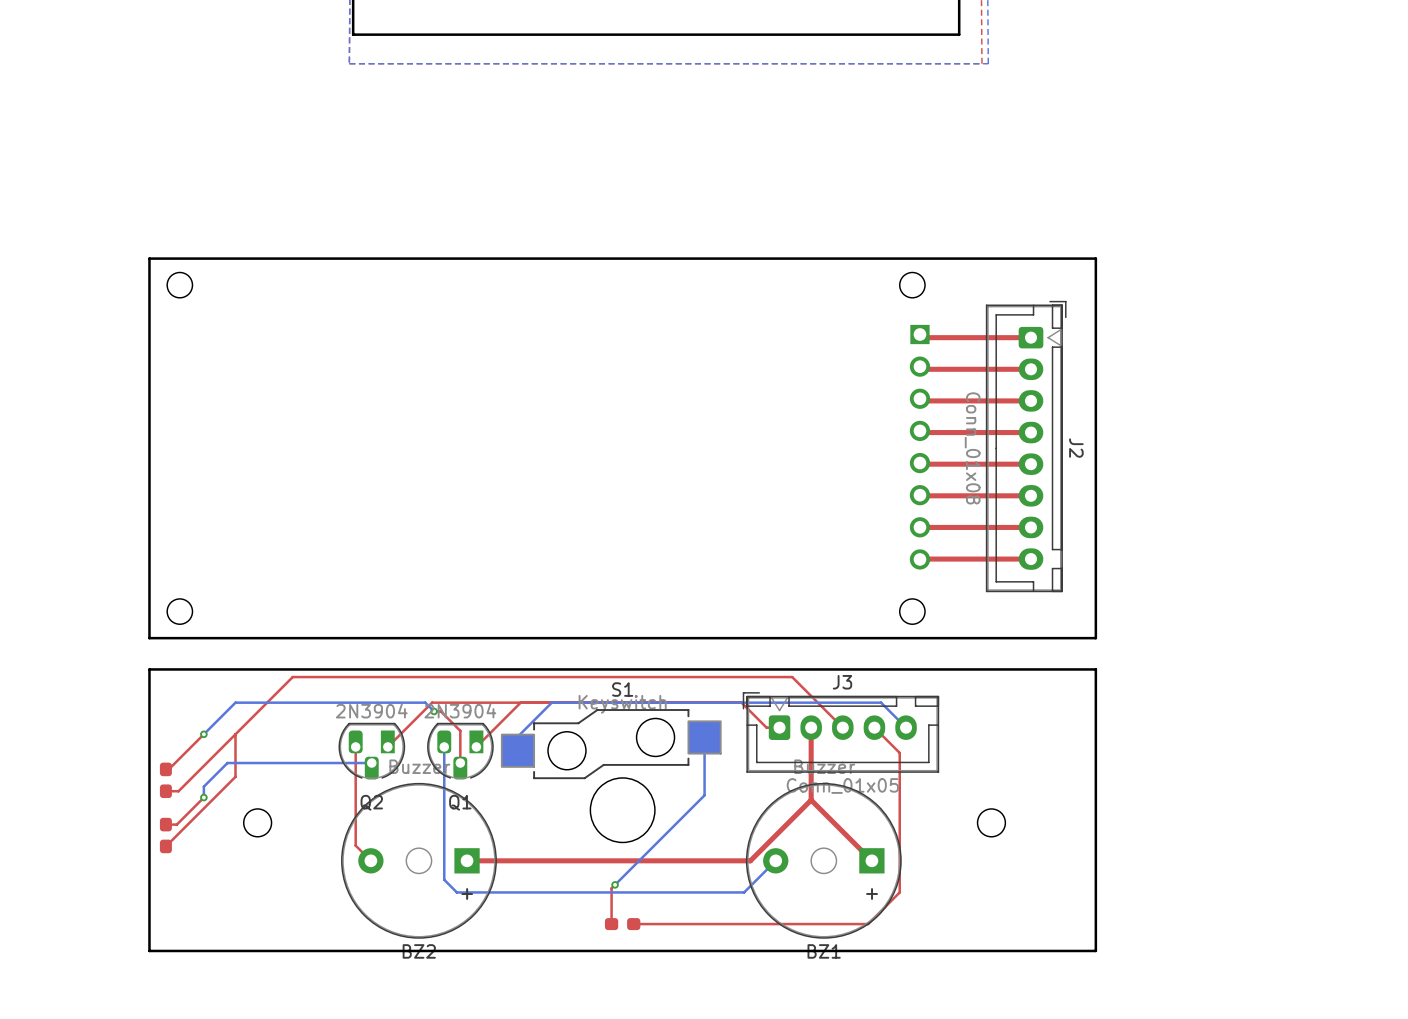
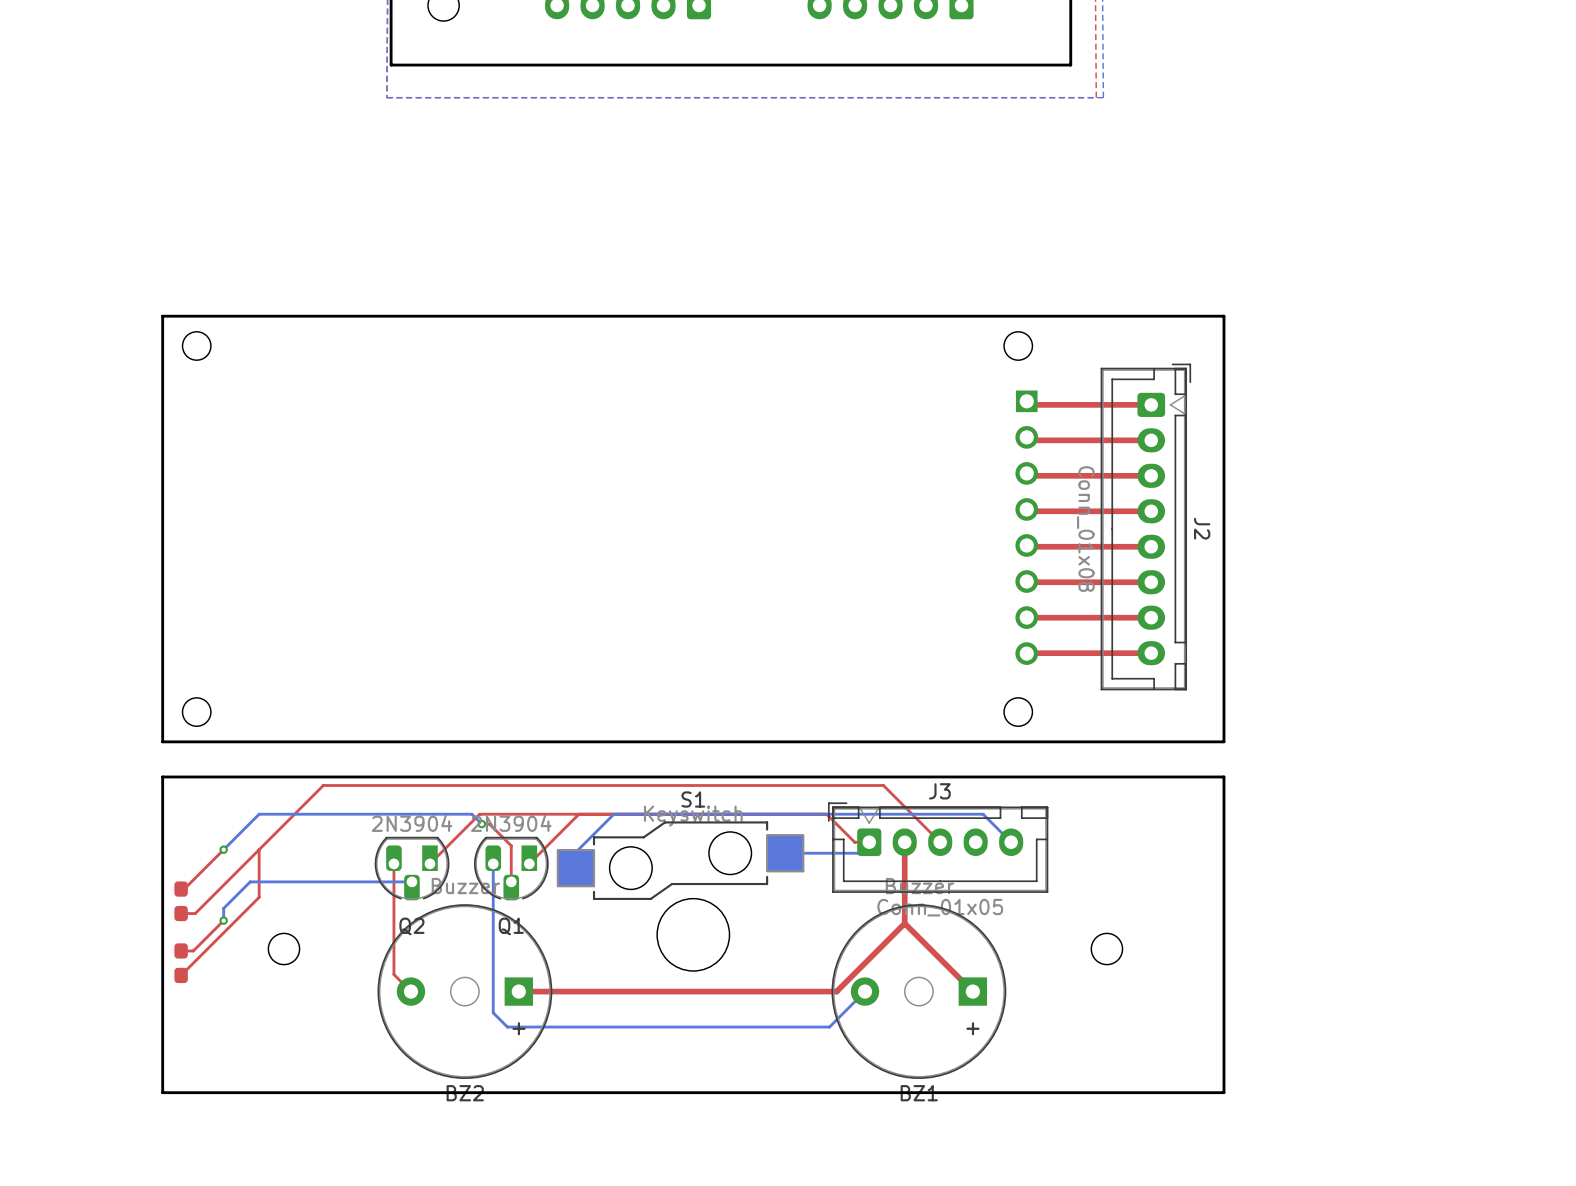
top track: (874, 727) (899, 752) (899, 892) (868, 924) (633, 924) -> none
bottom track: (704, 737) (704, 795) (615, 884) -> (785, 853) (858, 853) (869, 842)
top track: (615, 884) (611, 888) (611, 924) -> none
via: (615, 884) -> none
part: (622, 924) -> none

